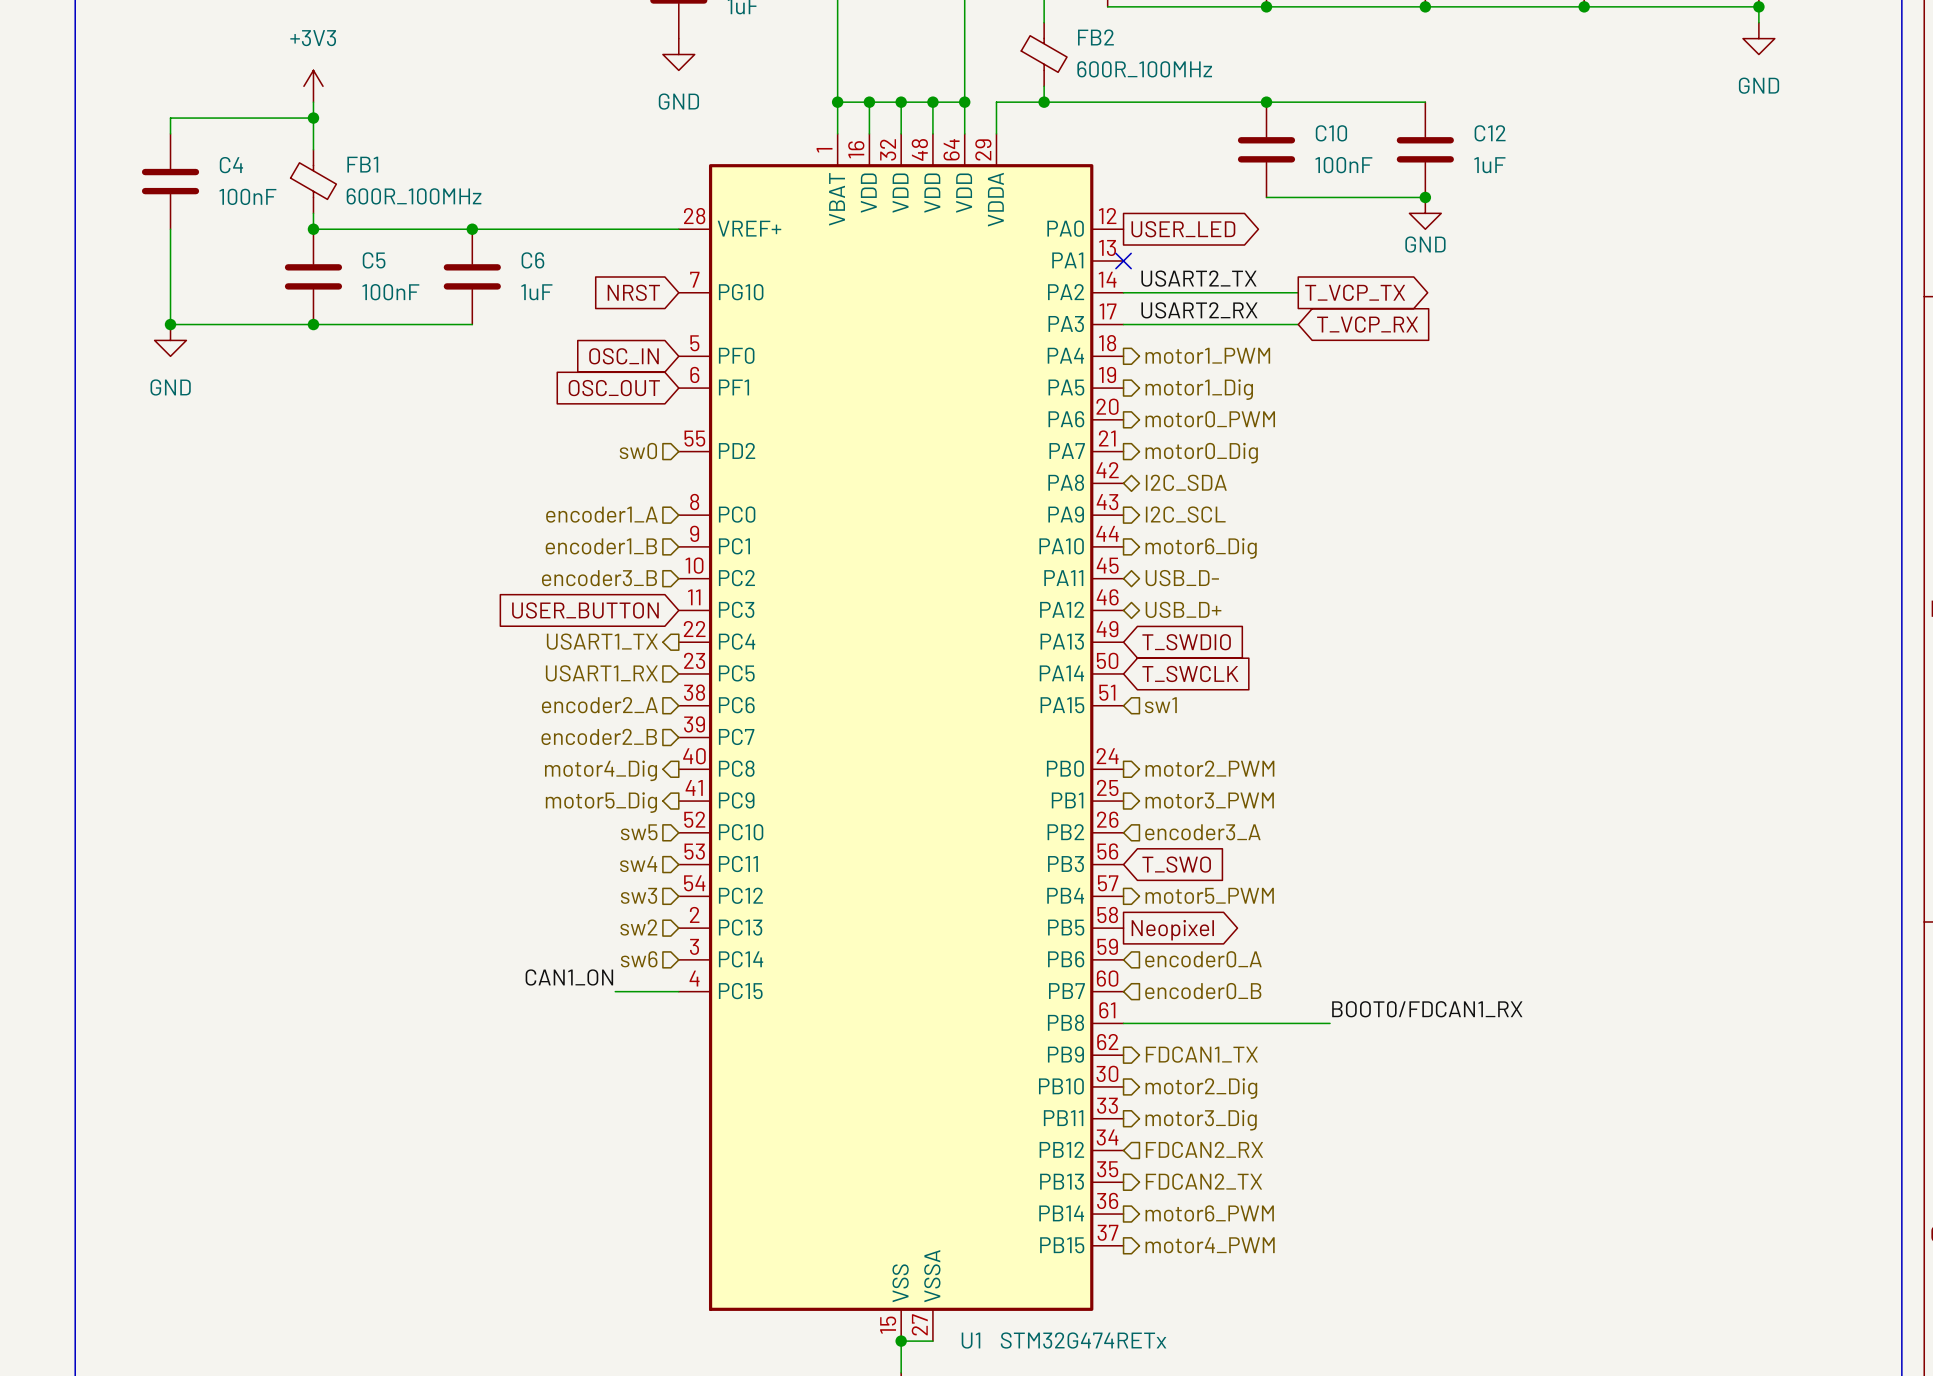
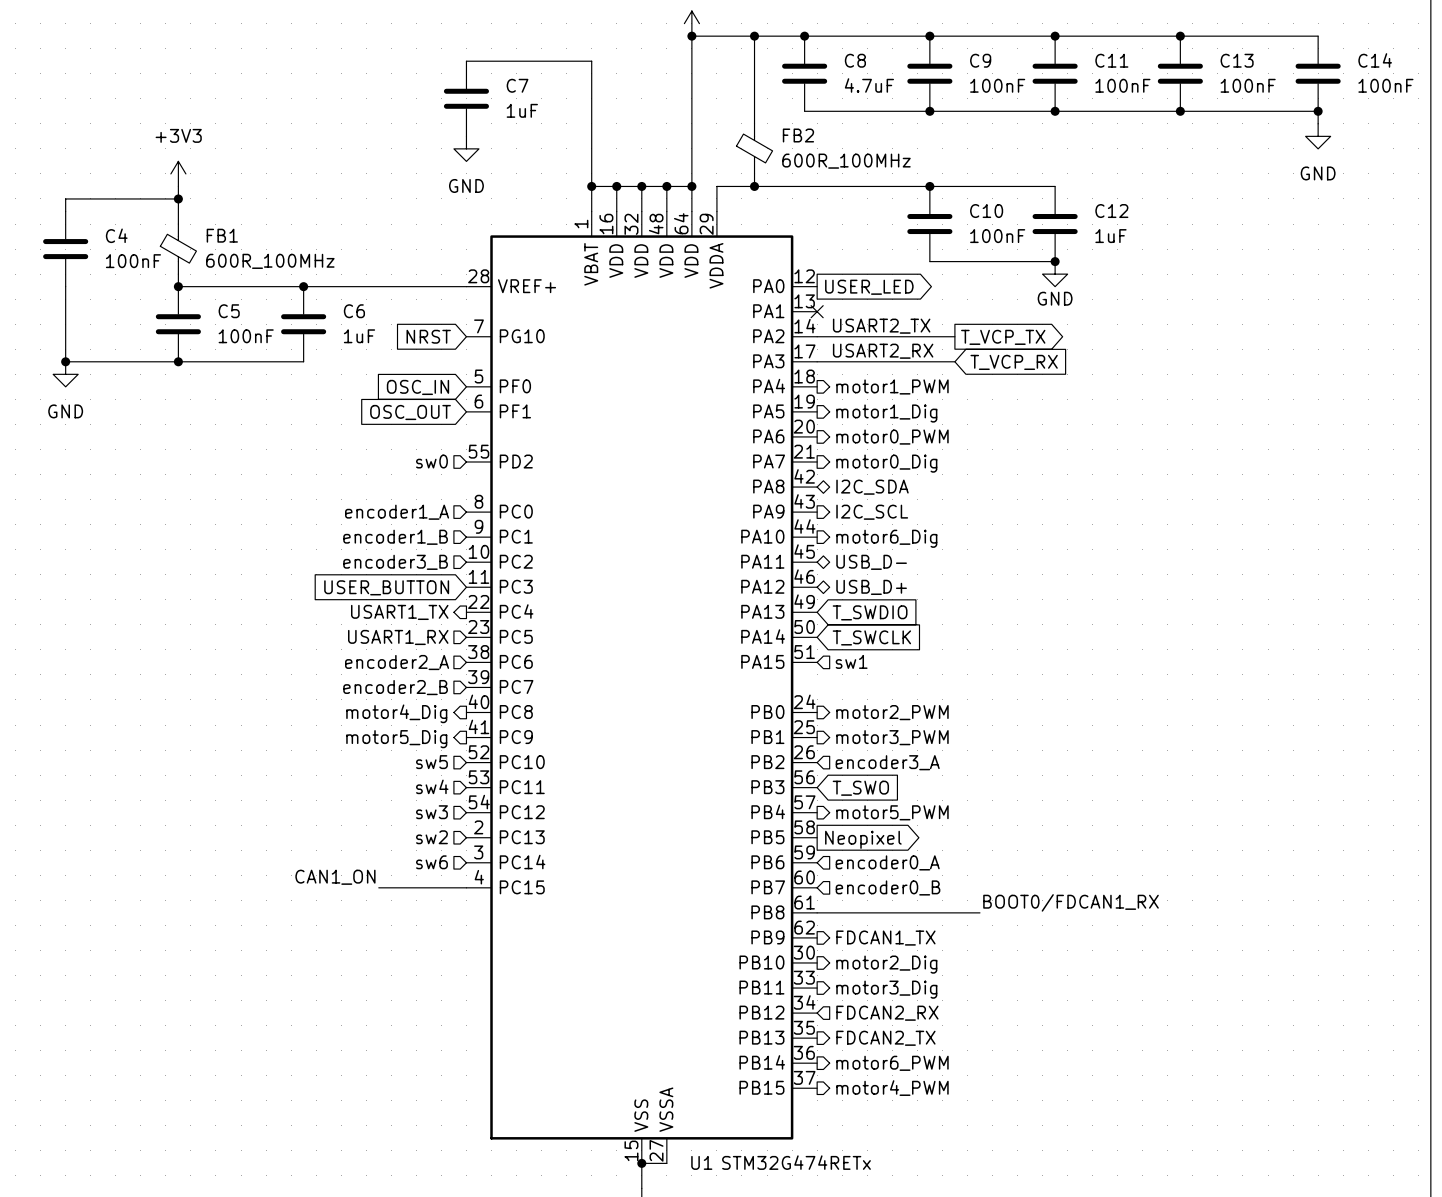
label position: CAN1_ON (569, 977) -> CAN1_ON (335, 877)
wire: none -> (378, 887) (416, 887)

